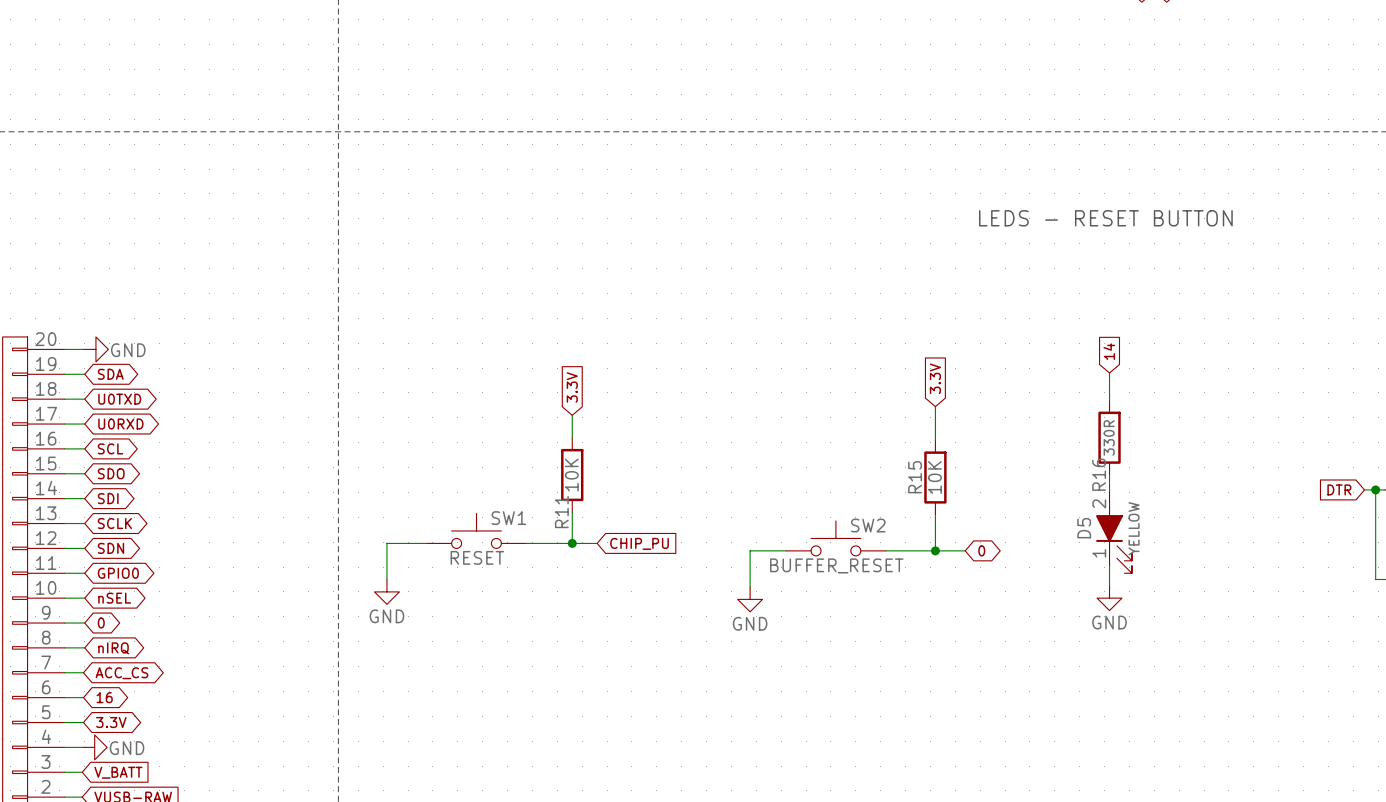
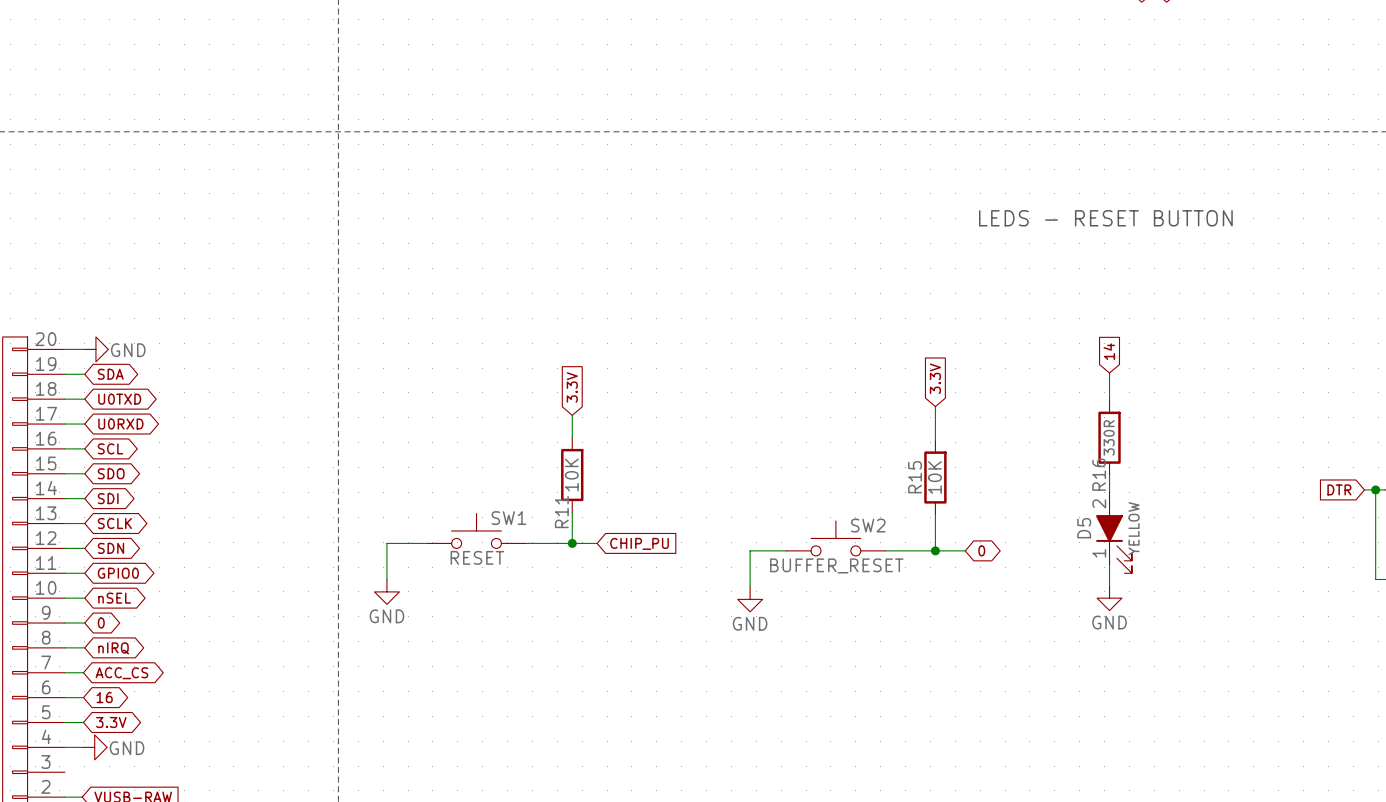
wire: (64, 772) (82, 772) -> none
global label: V_BATT (118, 772) -> none

